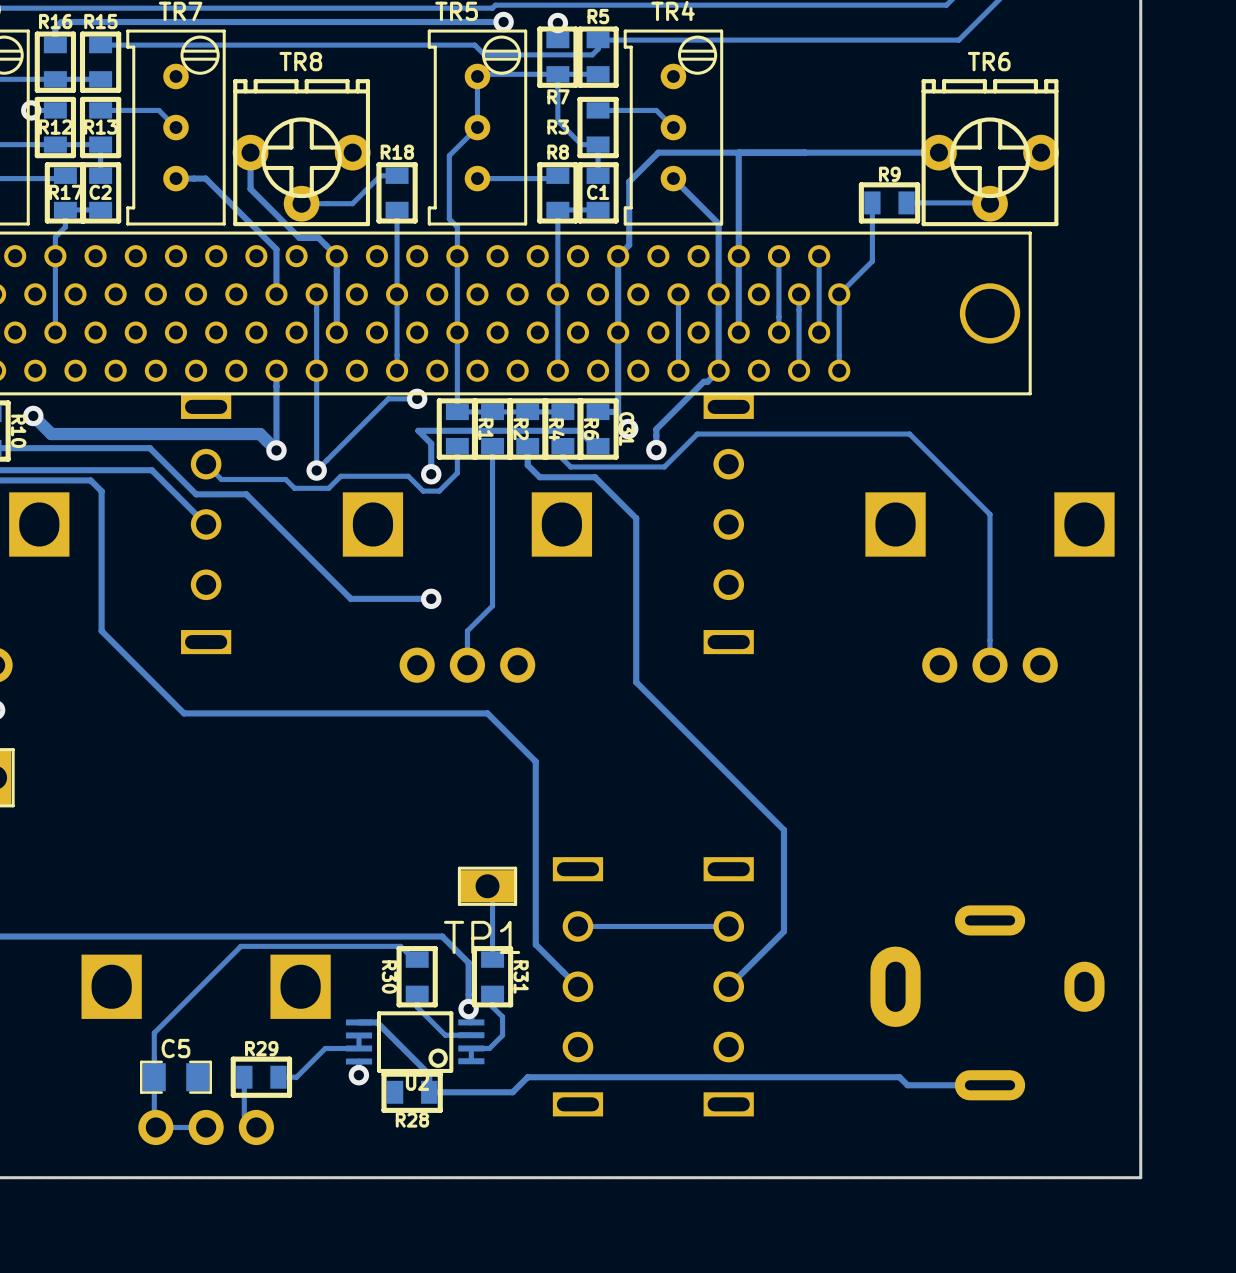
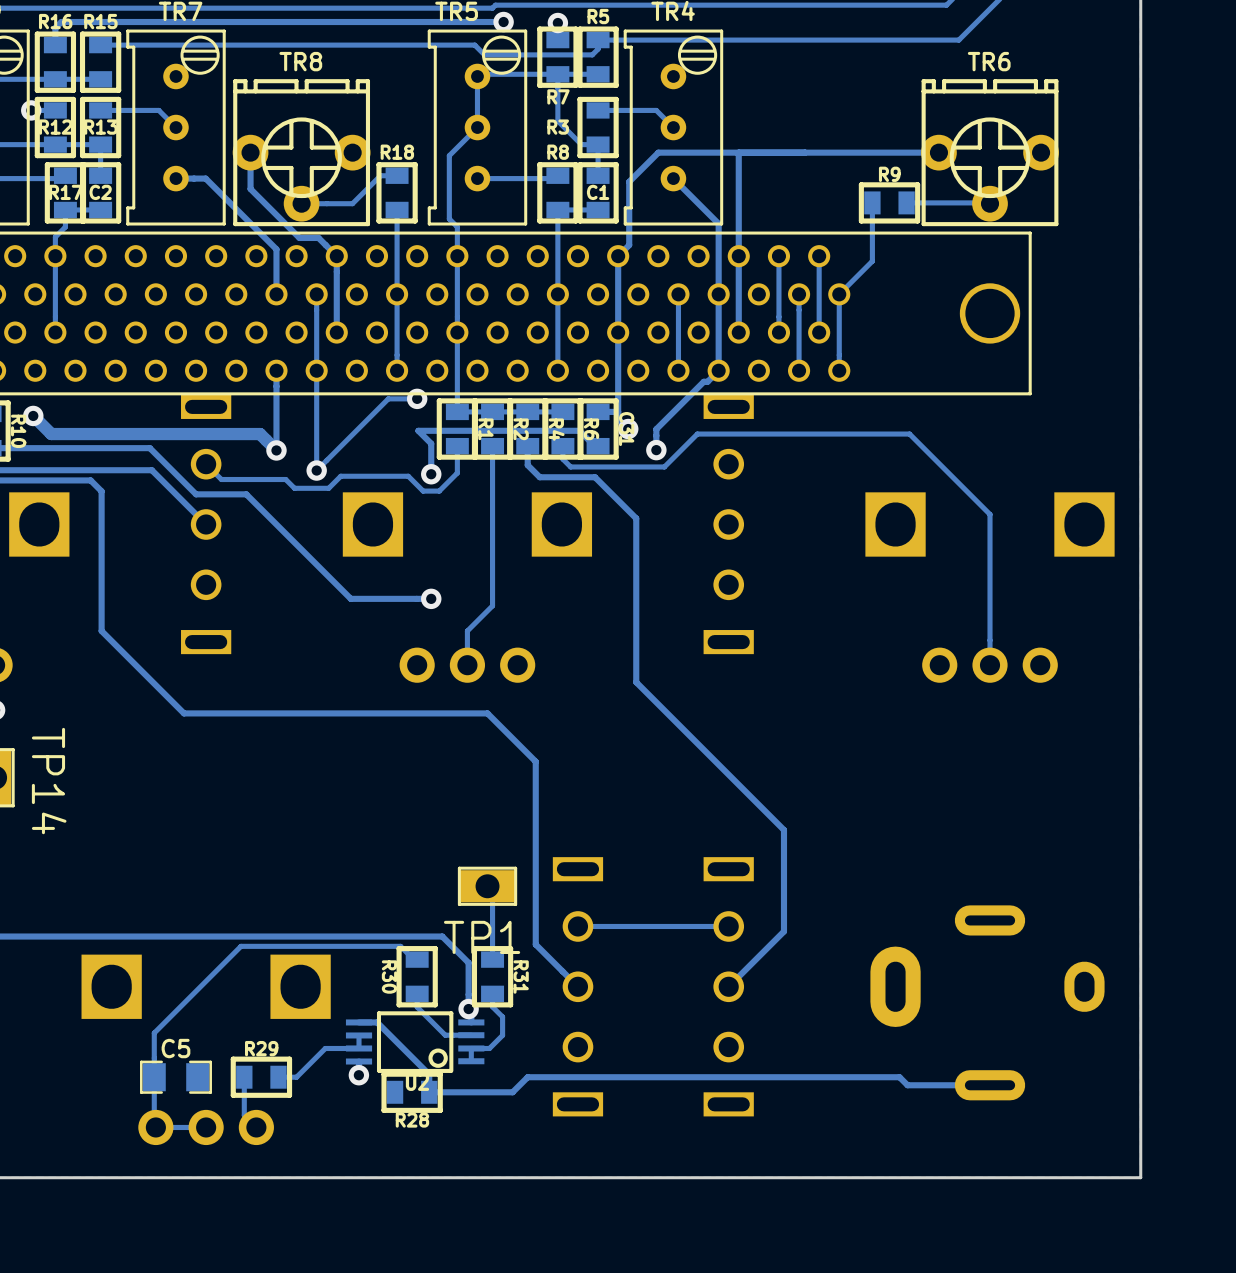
TP14 name: none -> TP14 (49, 781)

